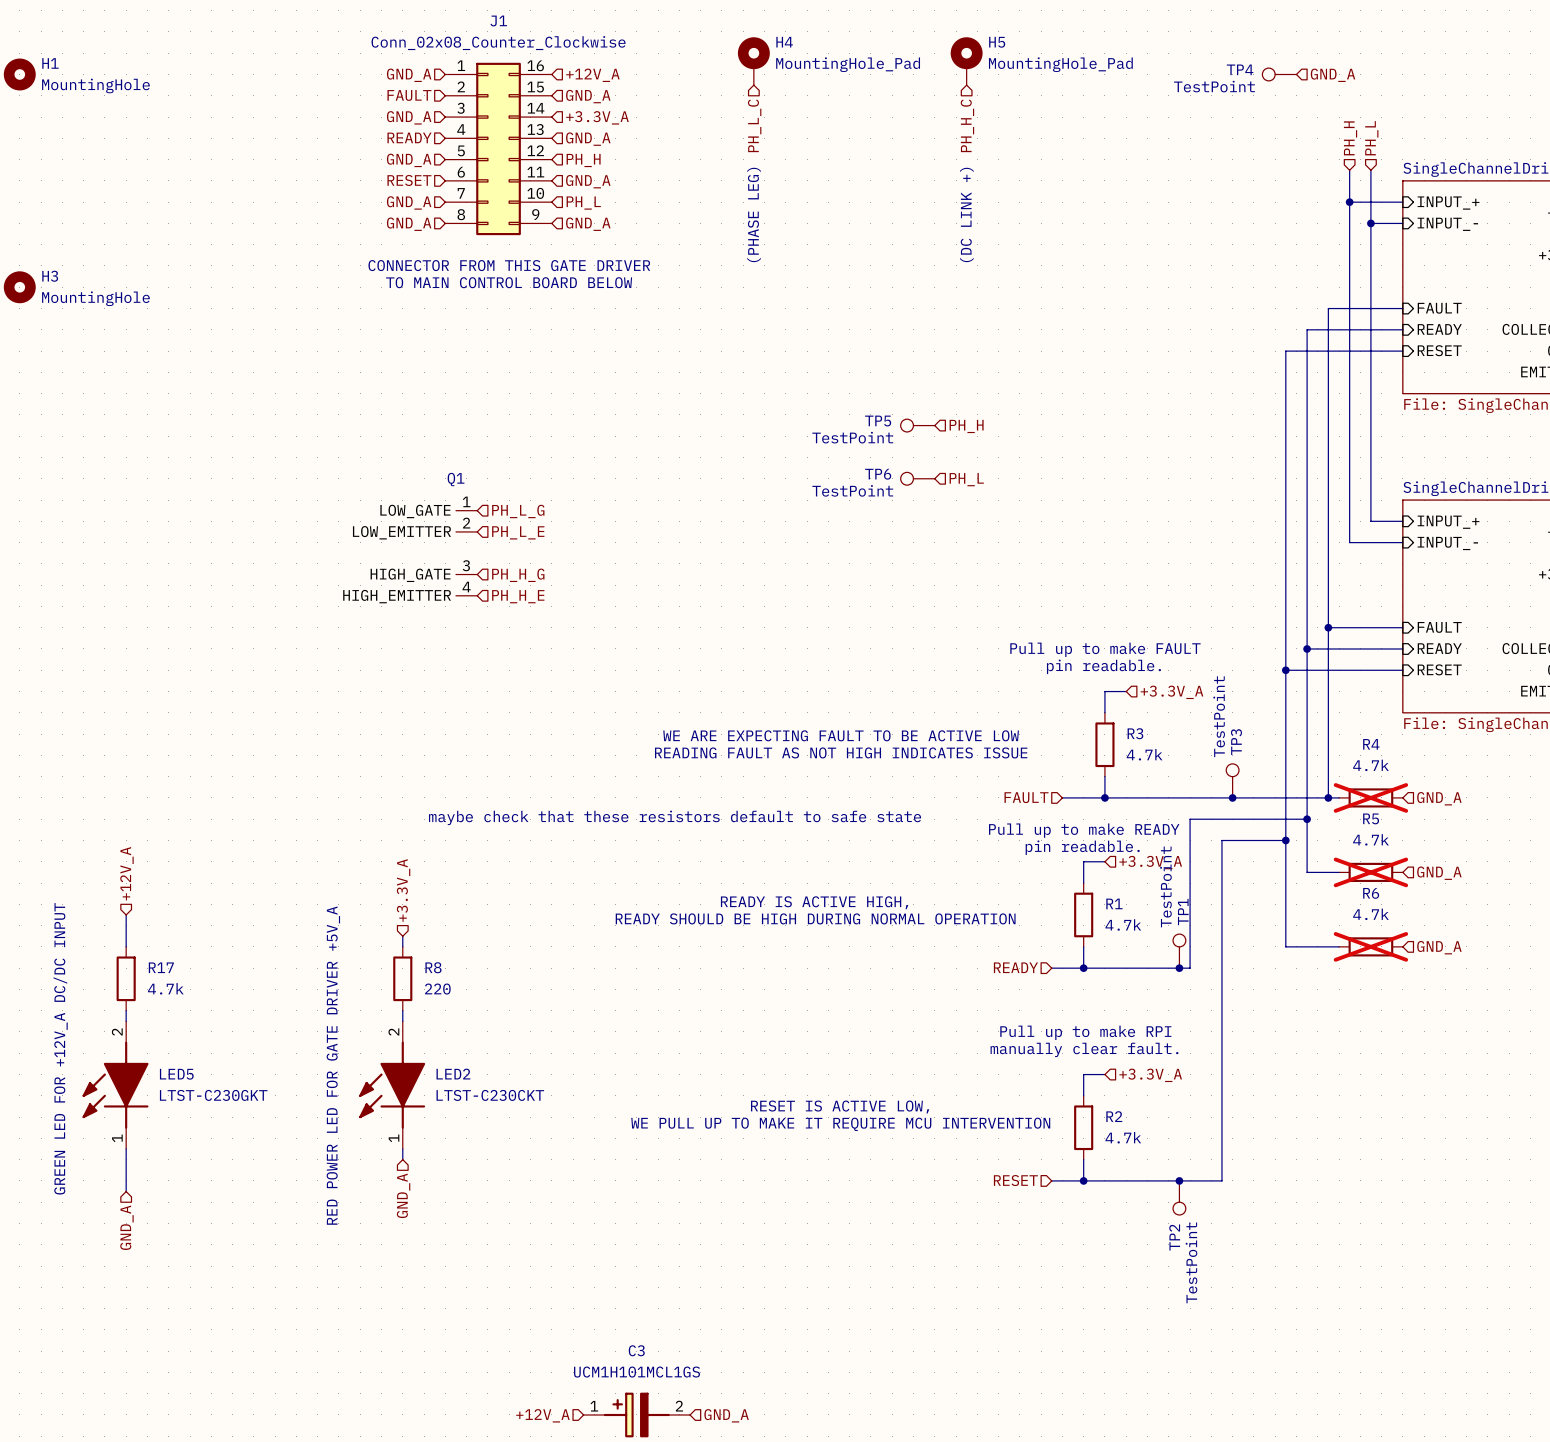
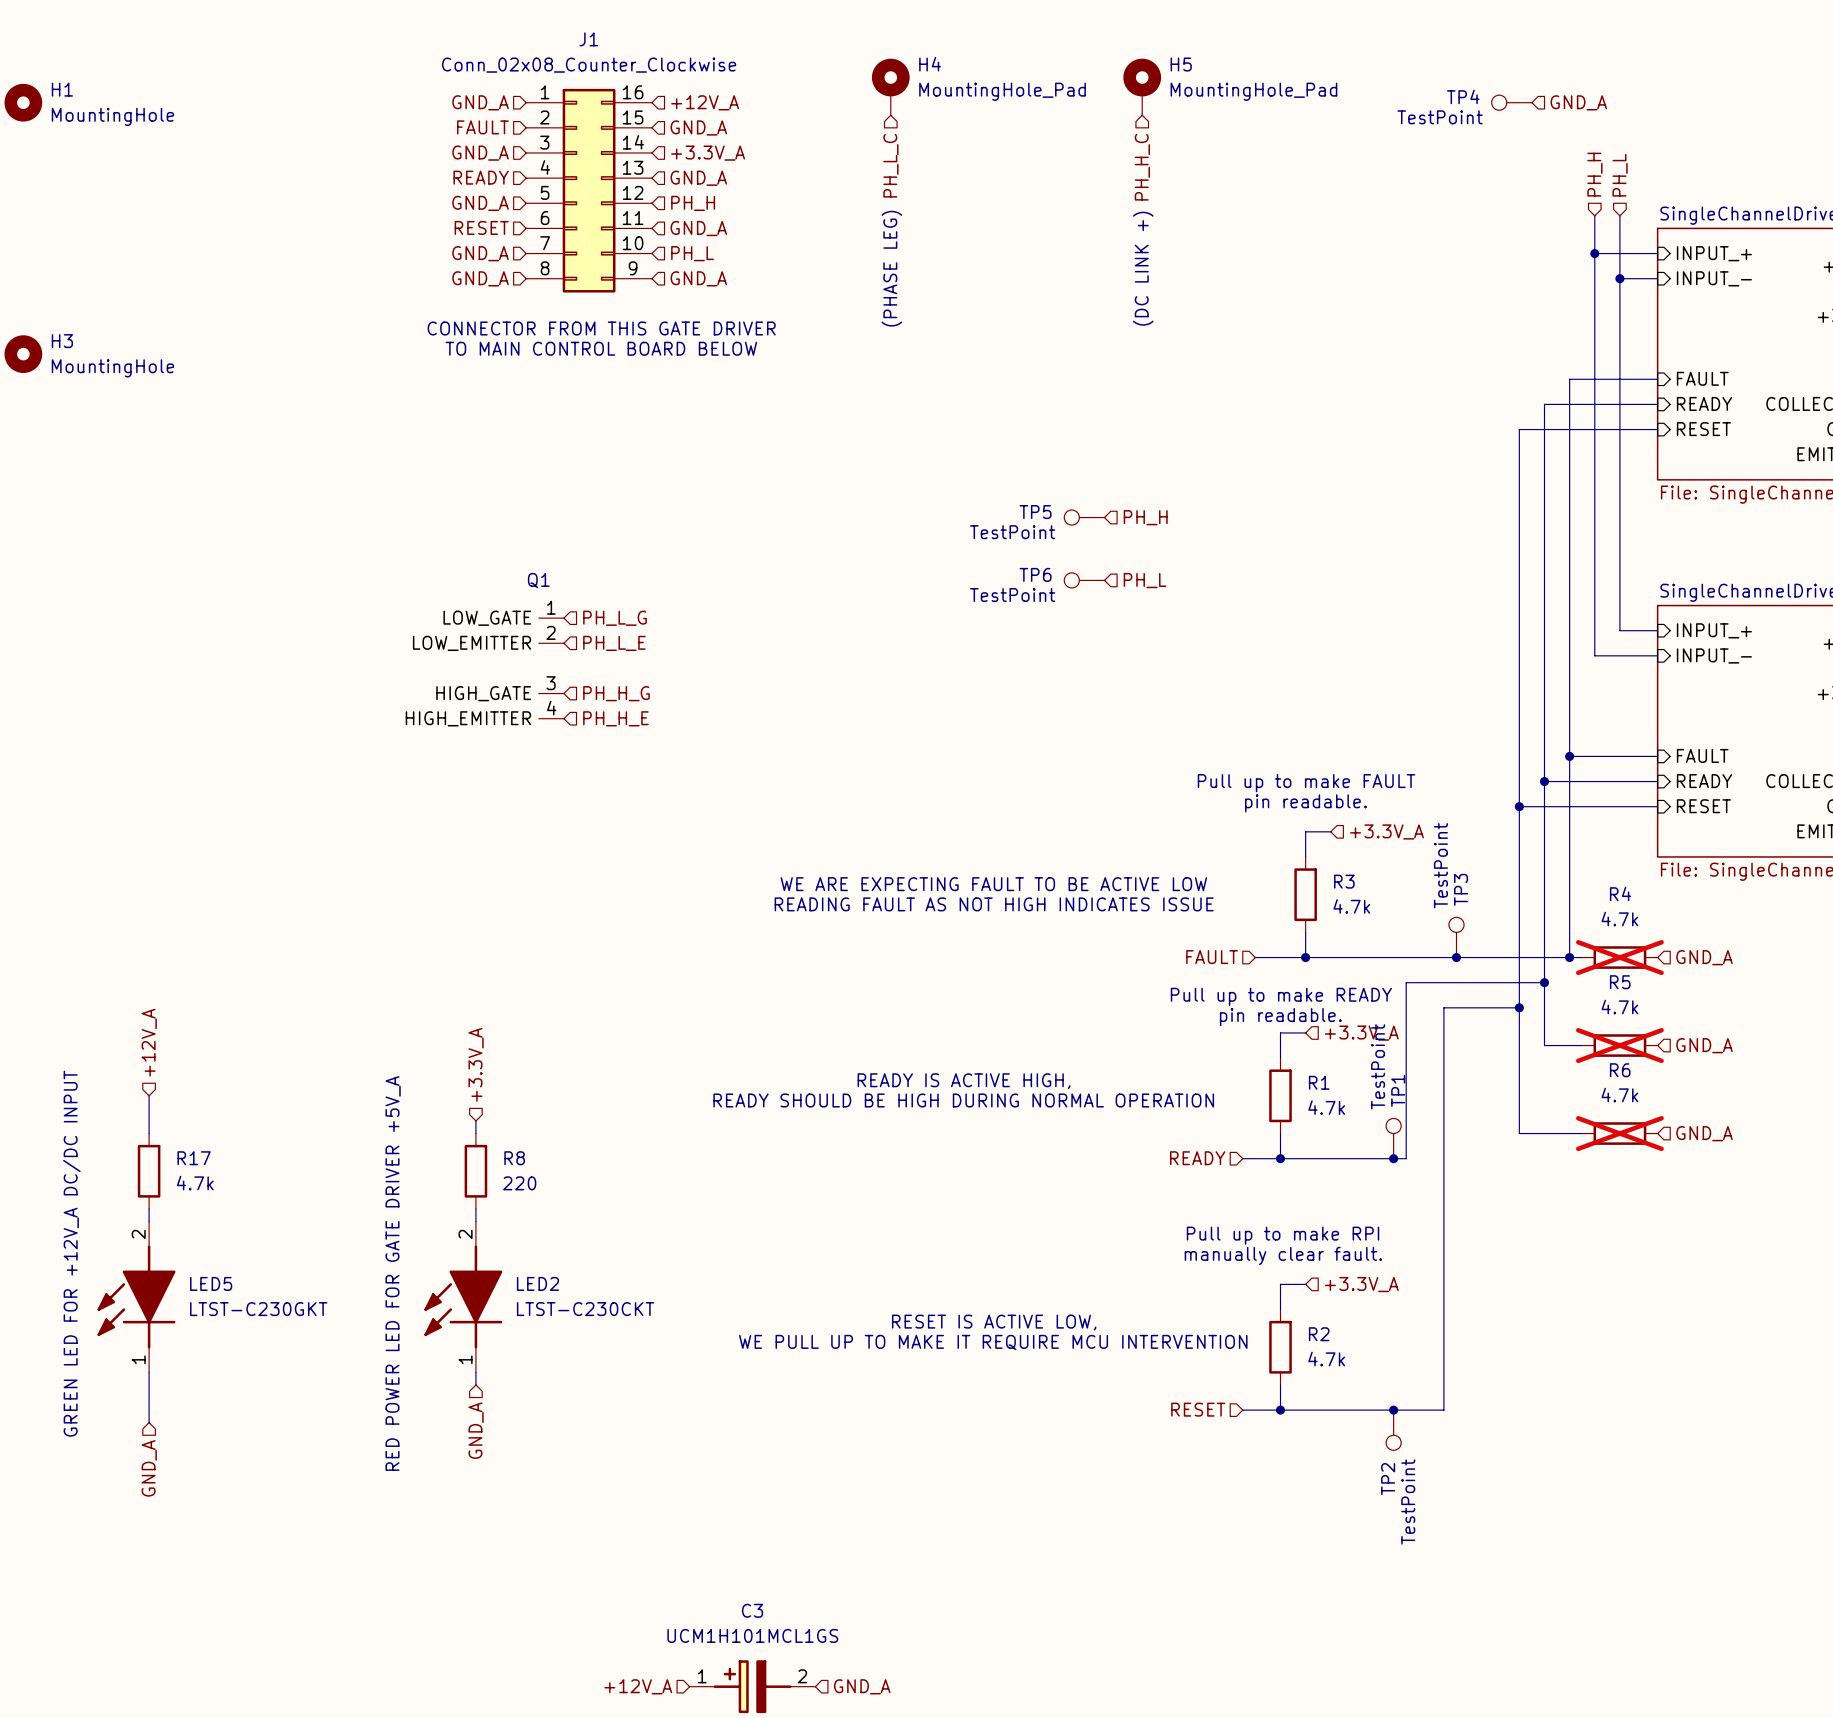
text: maybe check that these resistors default to safe state (675, 817) -> none

